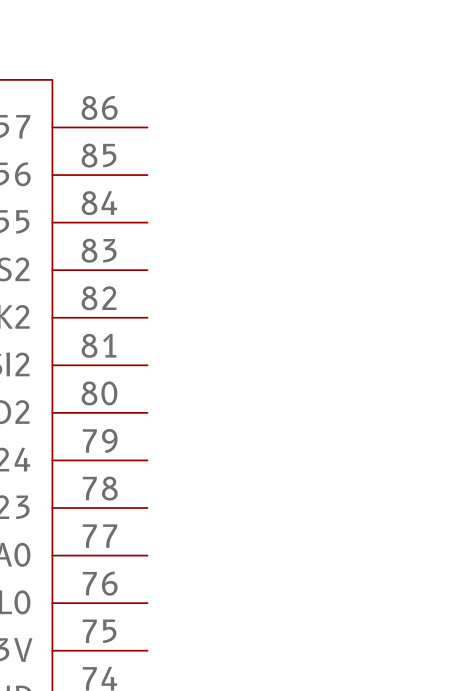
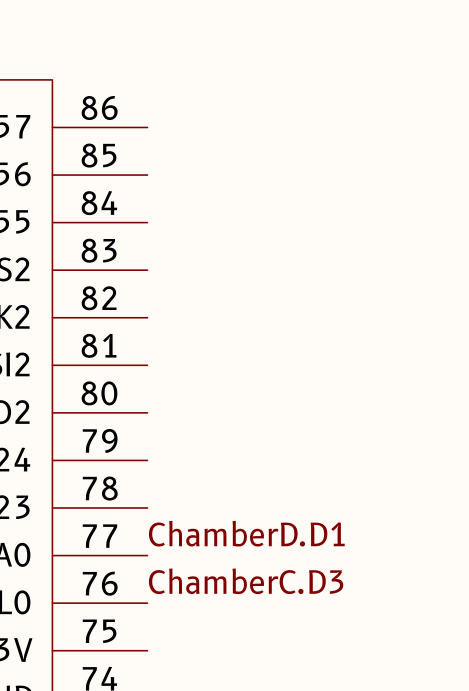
label: none -> ChamberD.D1 (246, 533)
label: none -> ChamberC.D3 (246, 581)

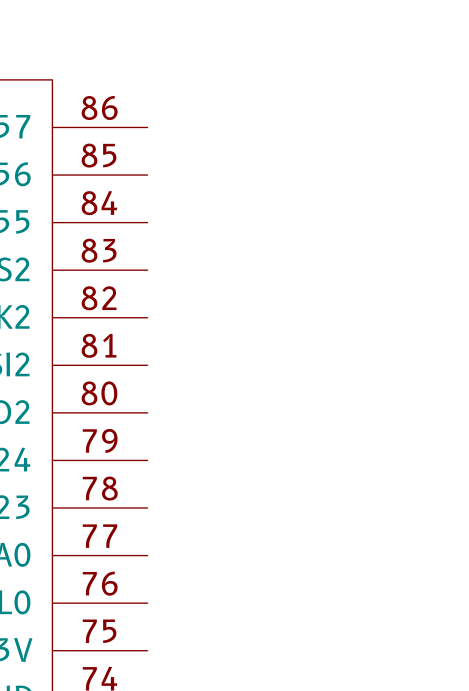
label: ChamberD.D1 (246, 533) -> none
label: ChamberC.D3 (246, 581) -> none

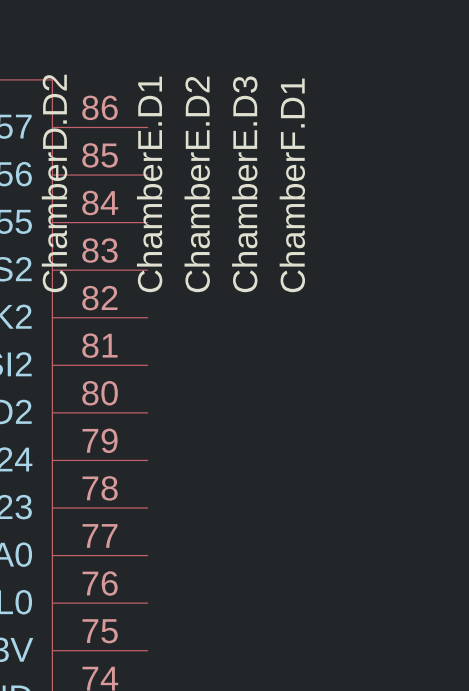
label: none -> ChamberD.D2 (54, 183)
label: none -> ChamberE.D1 (149, 184)
label: none -> ChamberE.D2 (197, 184)
label: none -> ChamberE.D3 (244, 184)
label: none -> ChamberF.D1 (292, 185)

